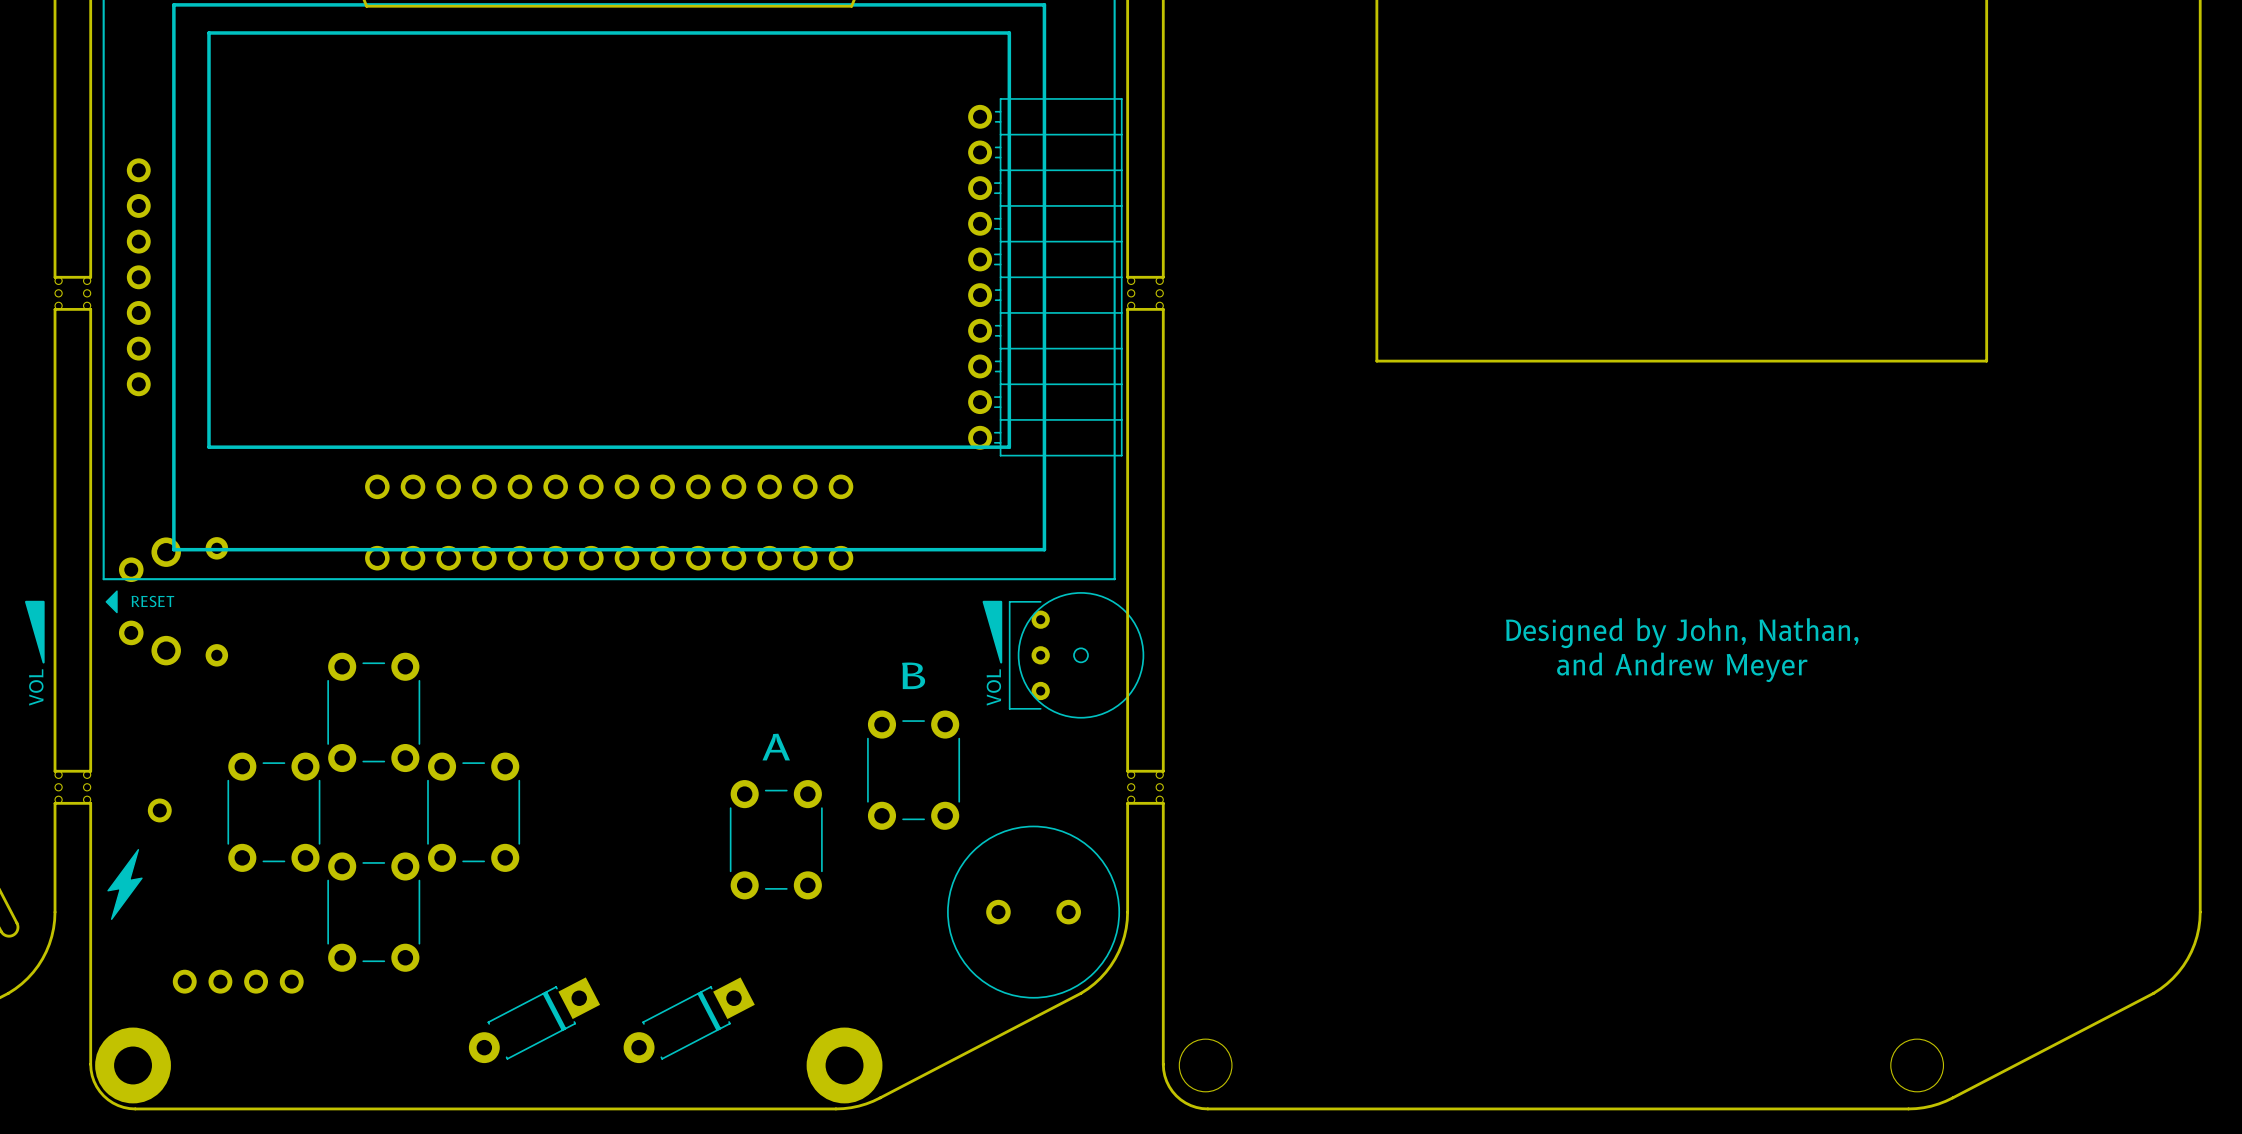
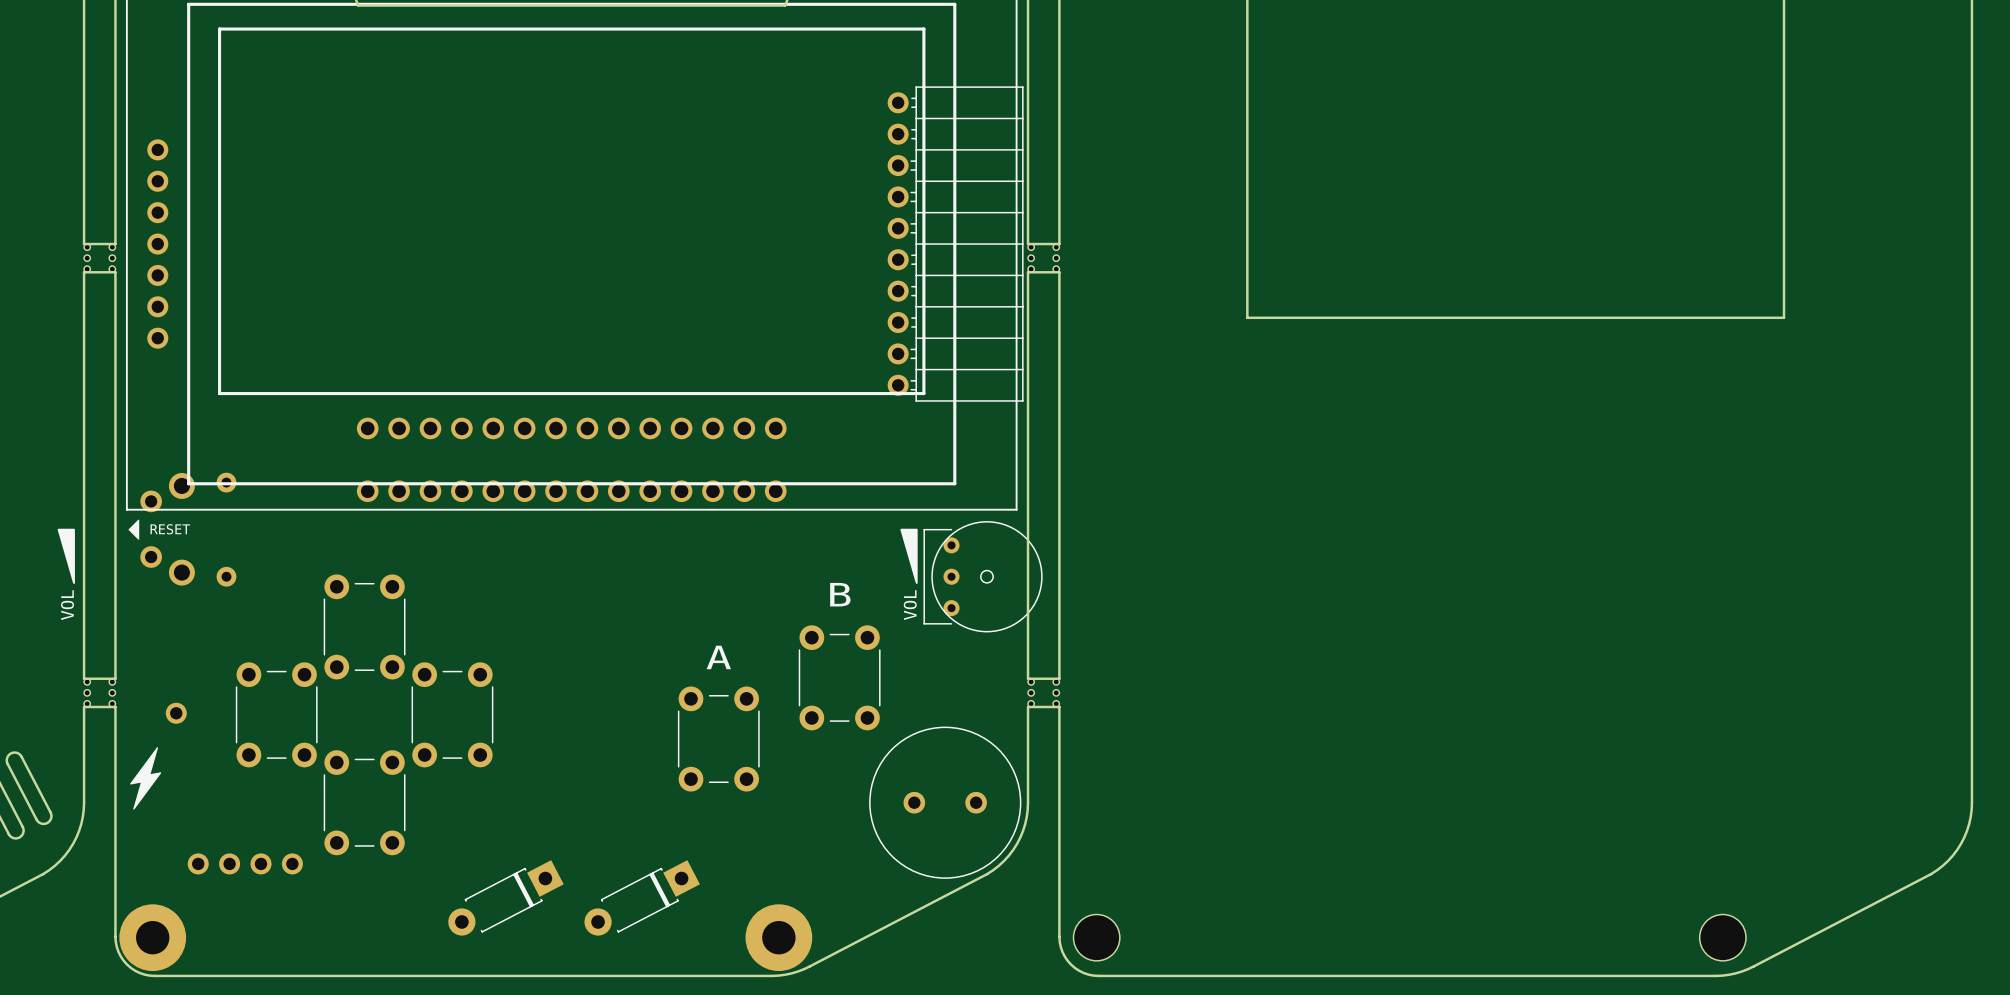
text: Designed by John, Nathan, (1682, 633) -> none
text: and Andrew Meyer (1682, 667) -> none

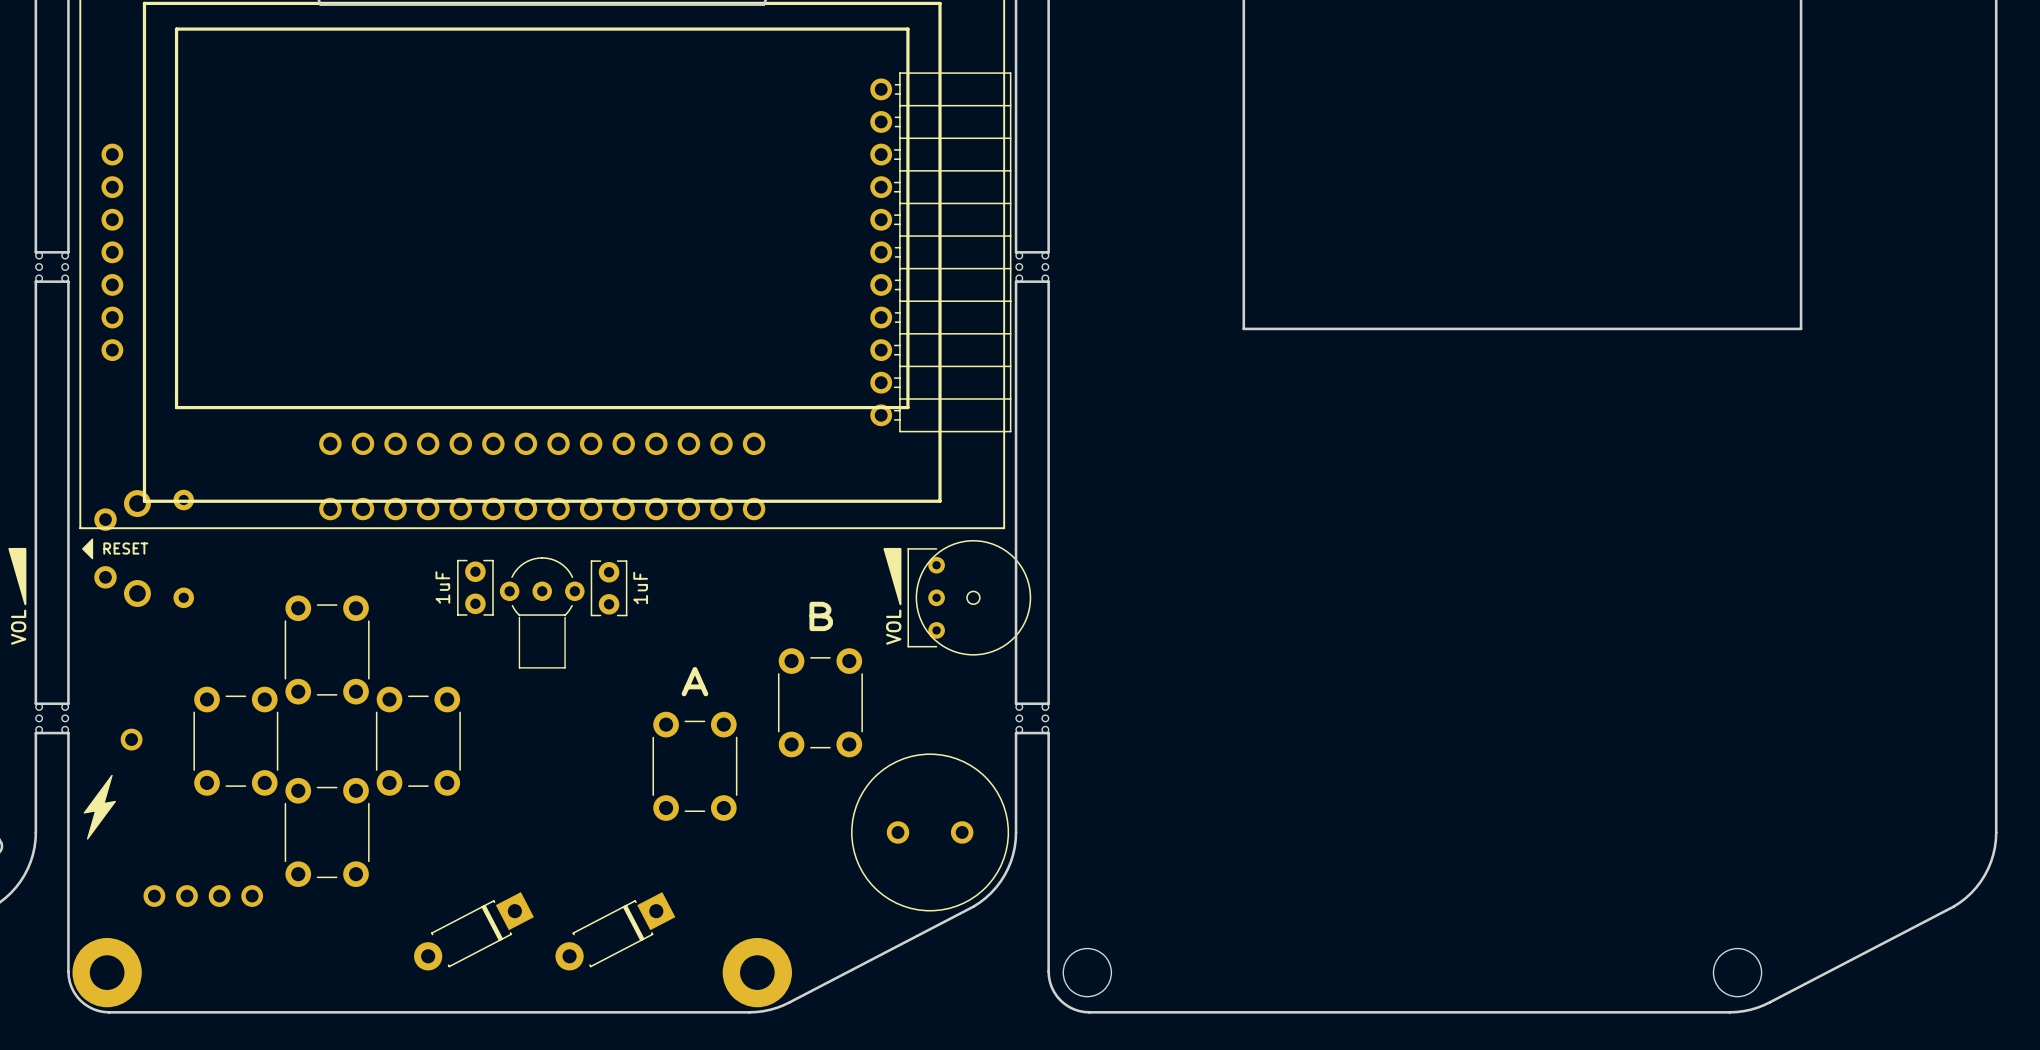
part footprint: [887, 86, 1024, 402] -> [870, 72, 1012, 433]
part: none -> 1uF (475, 587)
part: none -> 1uF (609, 588)
part: none -> (542, 612)

